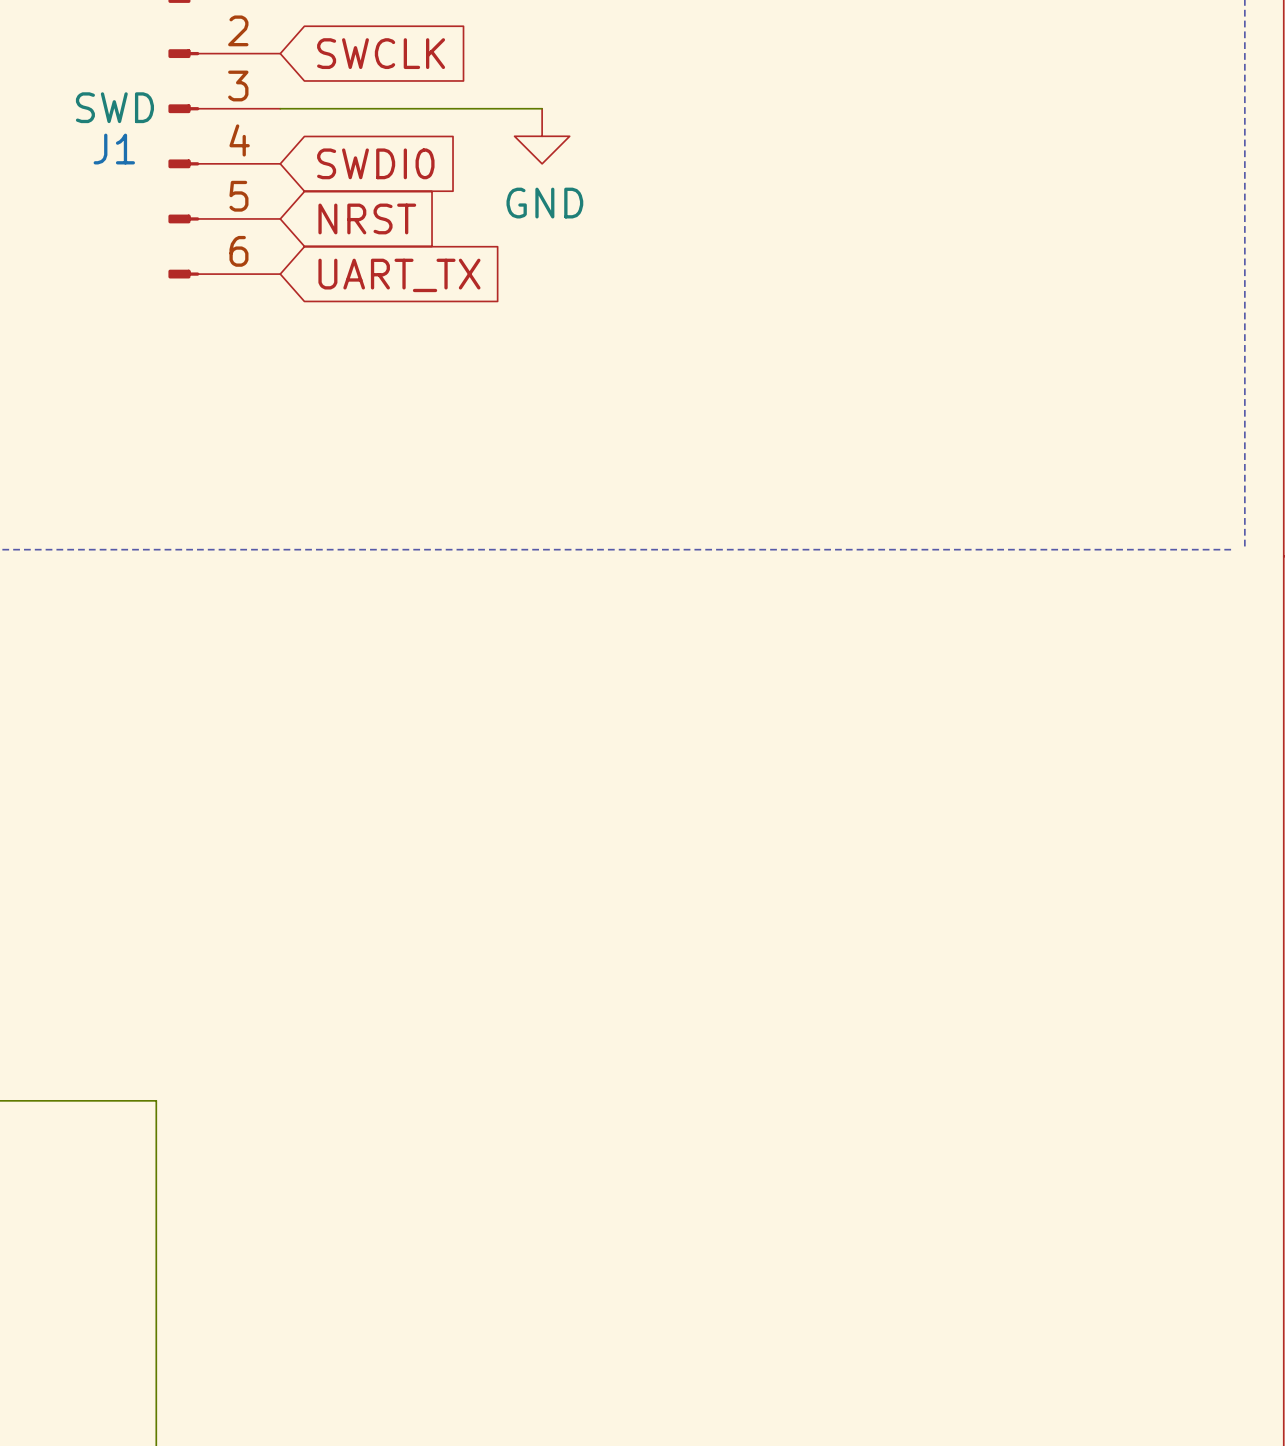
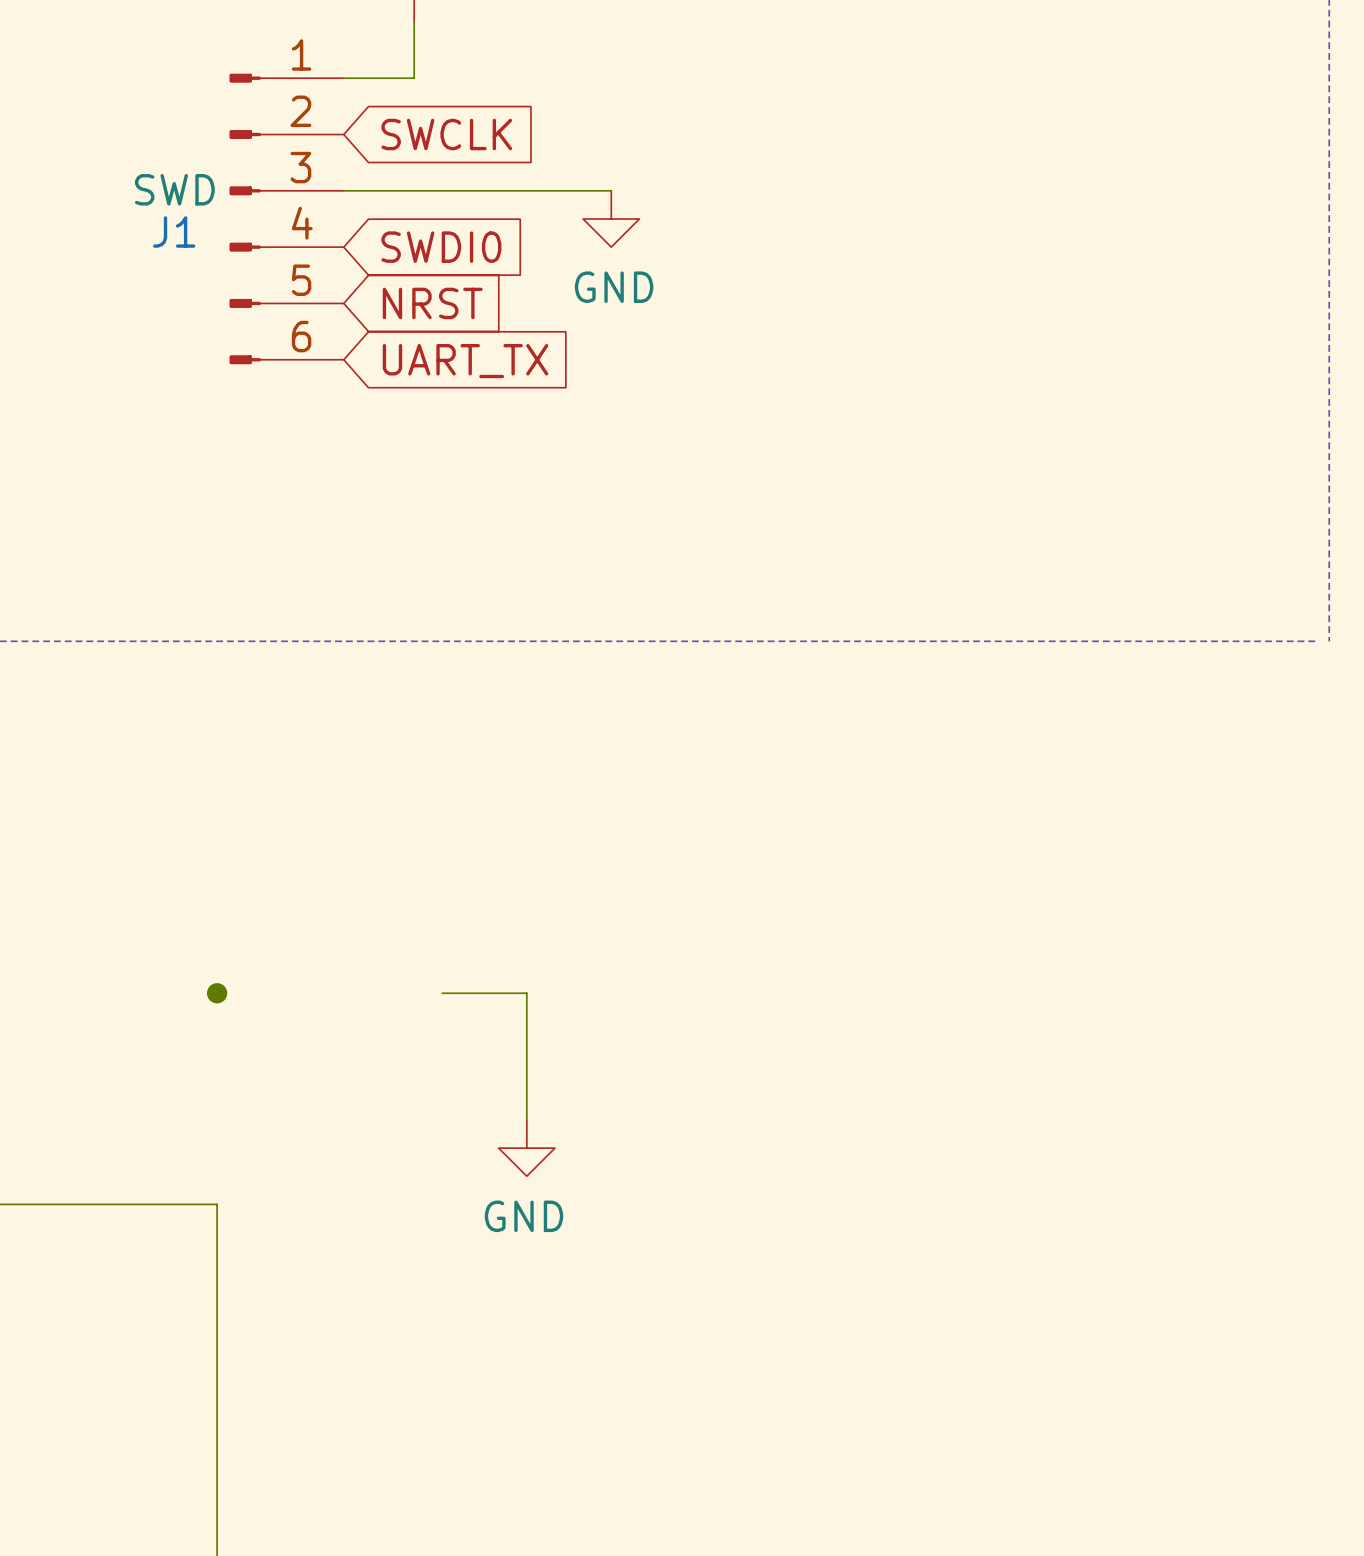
junction: none -> (217, 993)
wire: none -> (442, 993) (526, 993) (526, 1119)
power symbol: none -> GND (526, 1148)

